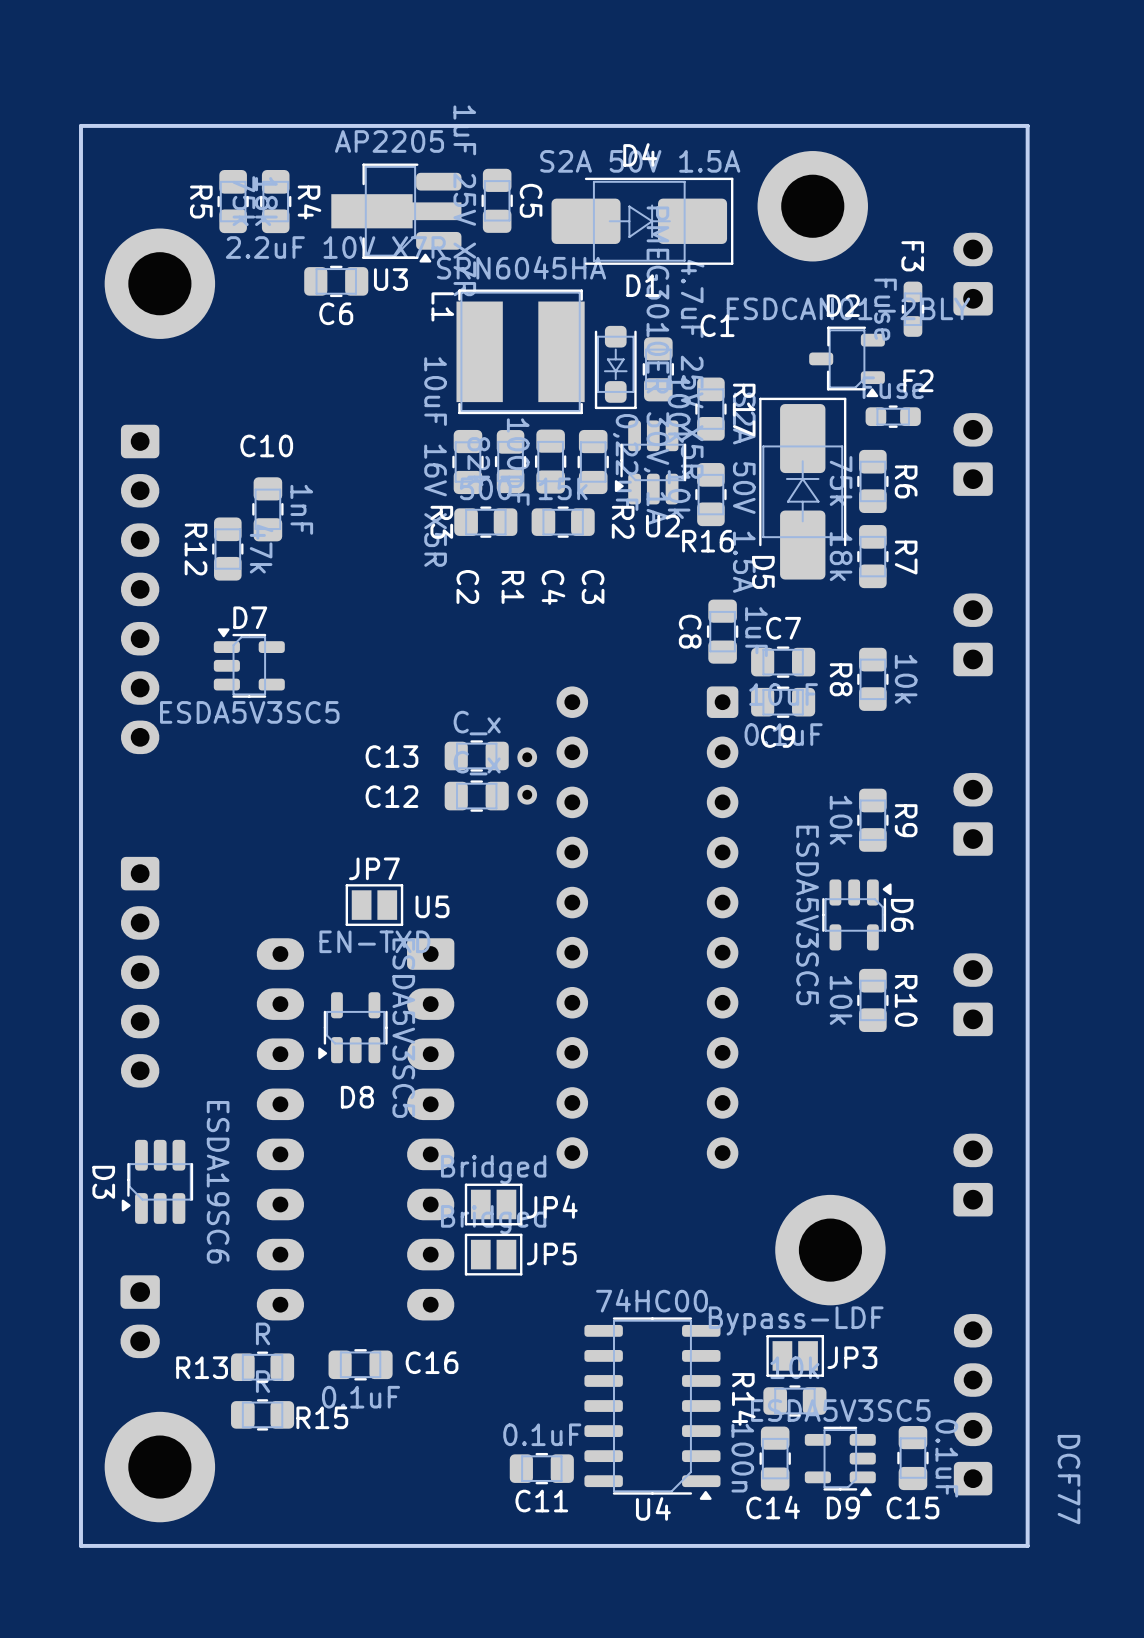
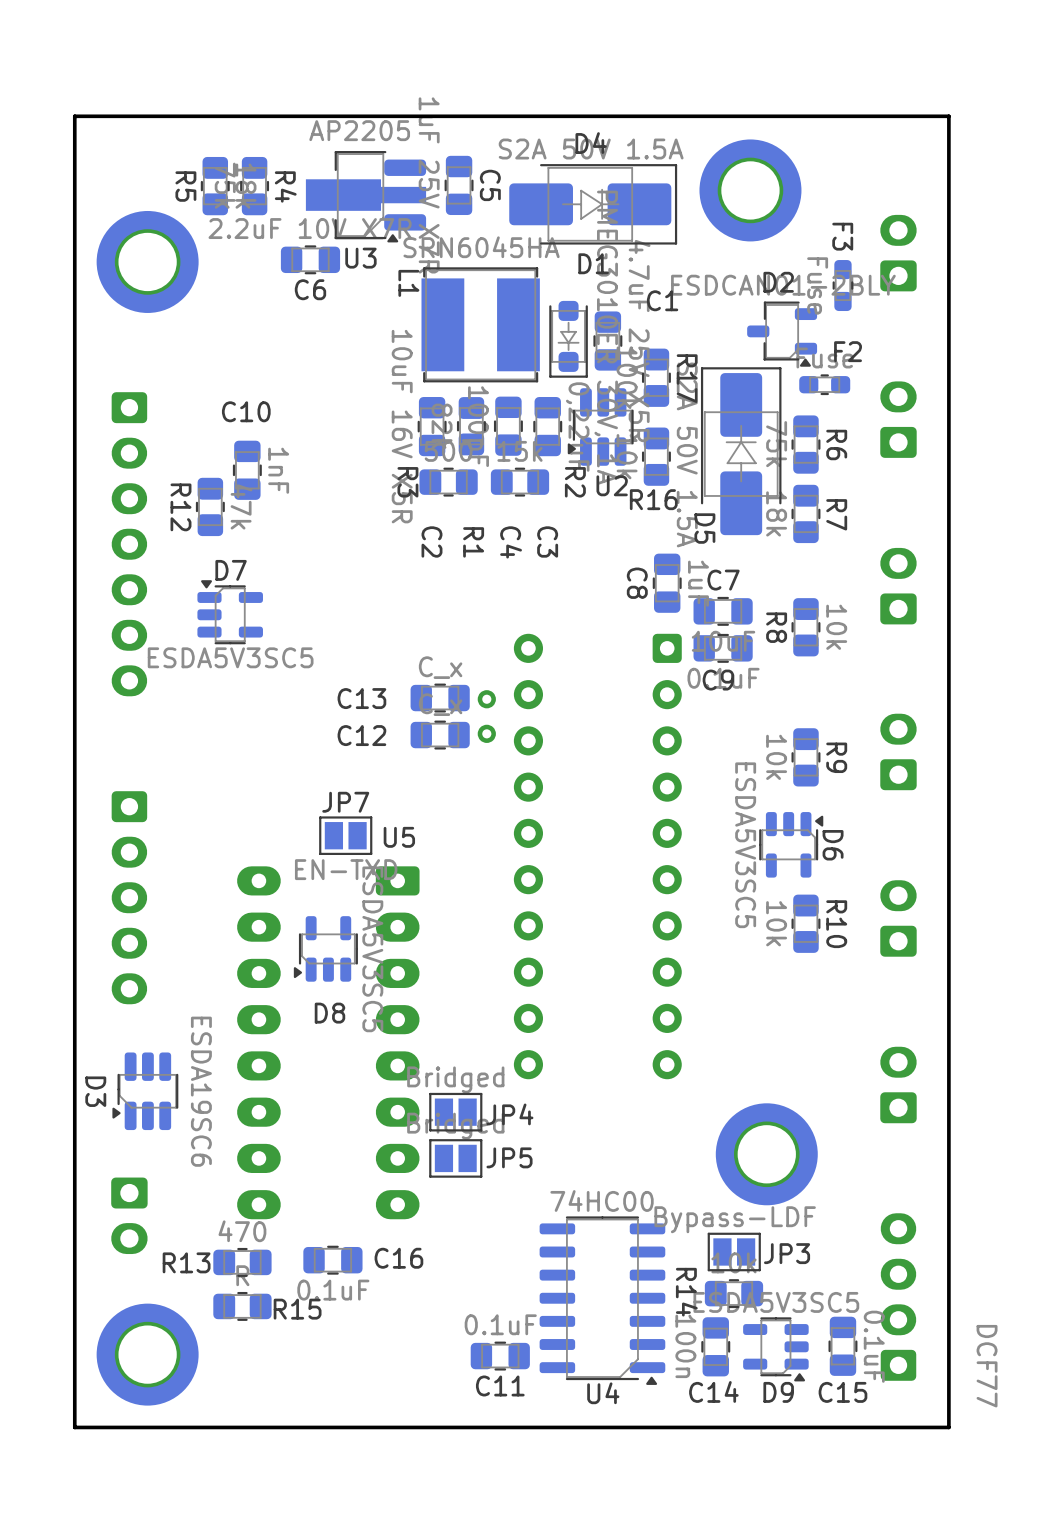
R13 value: R (263, 1333) -> 470 (242, 1231)

